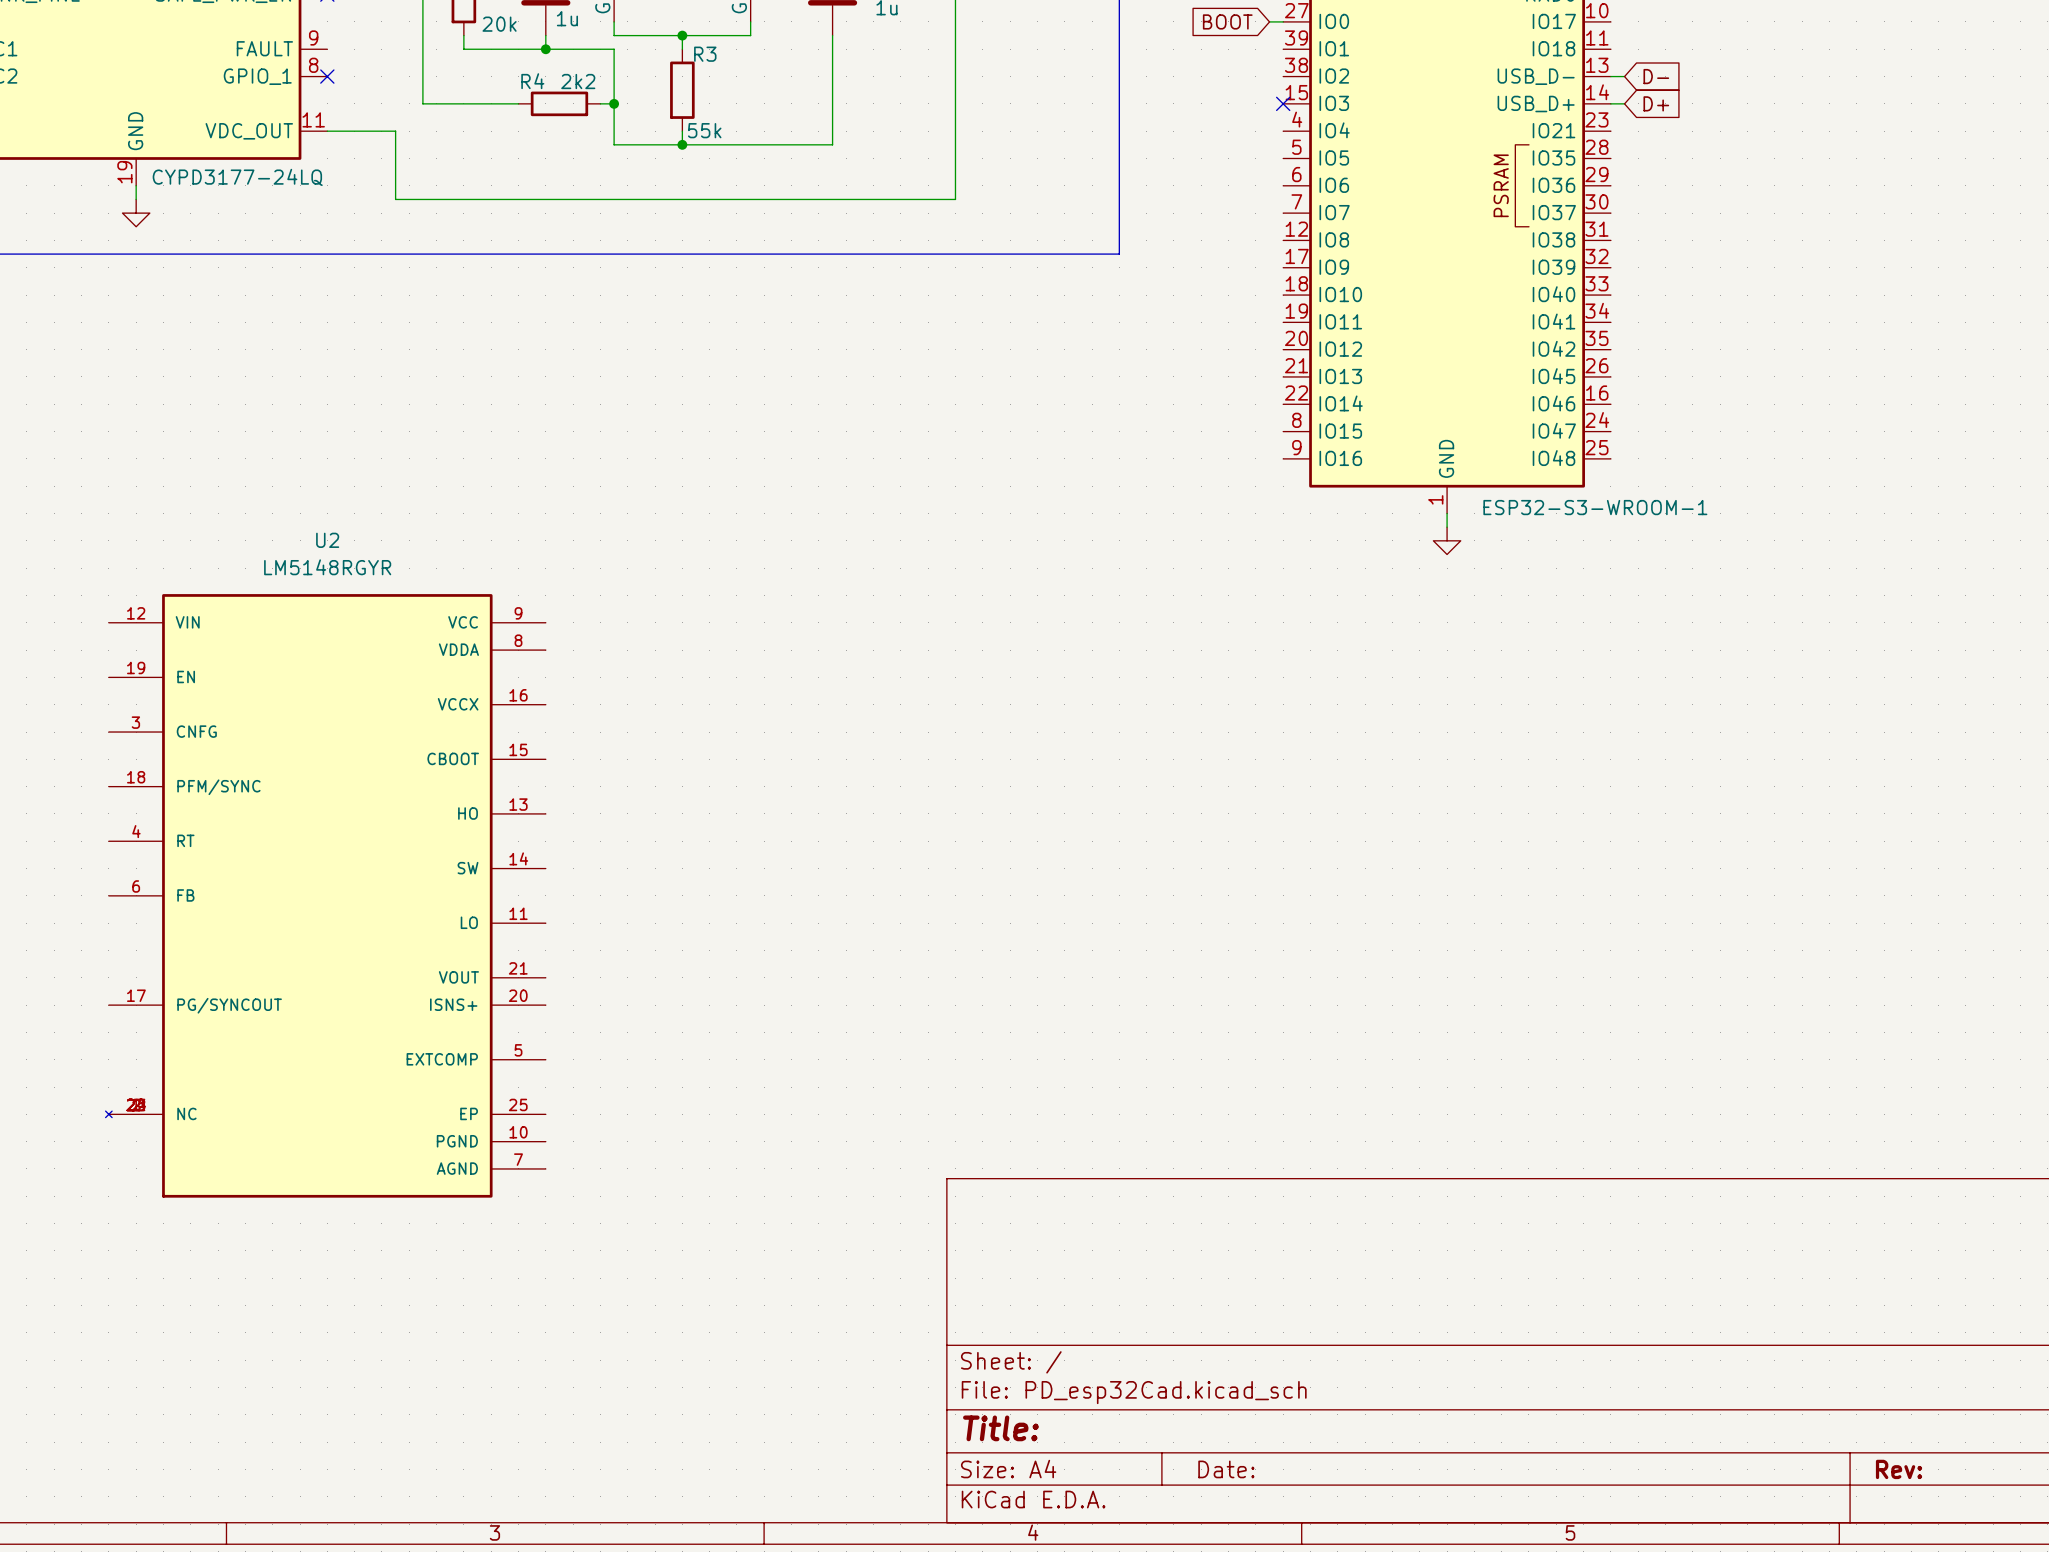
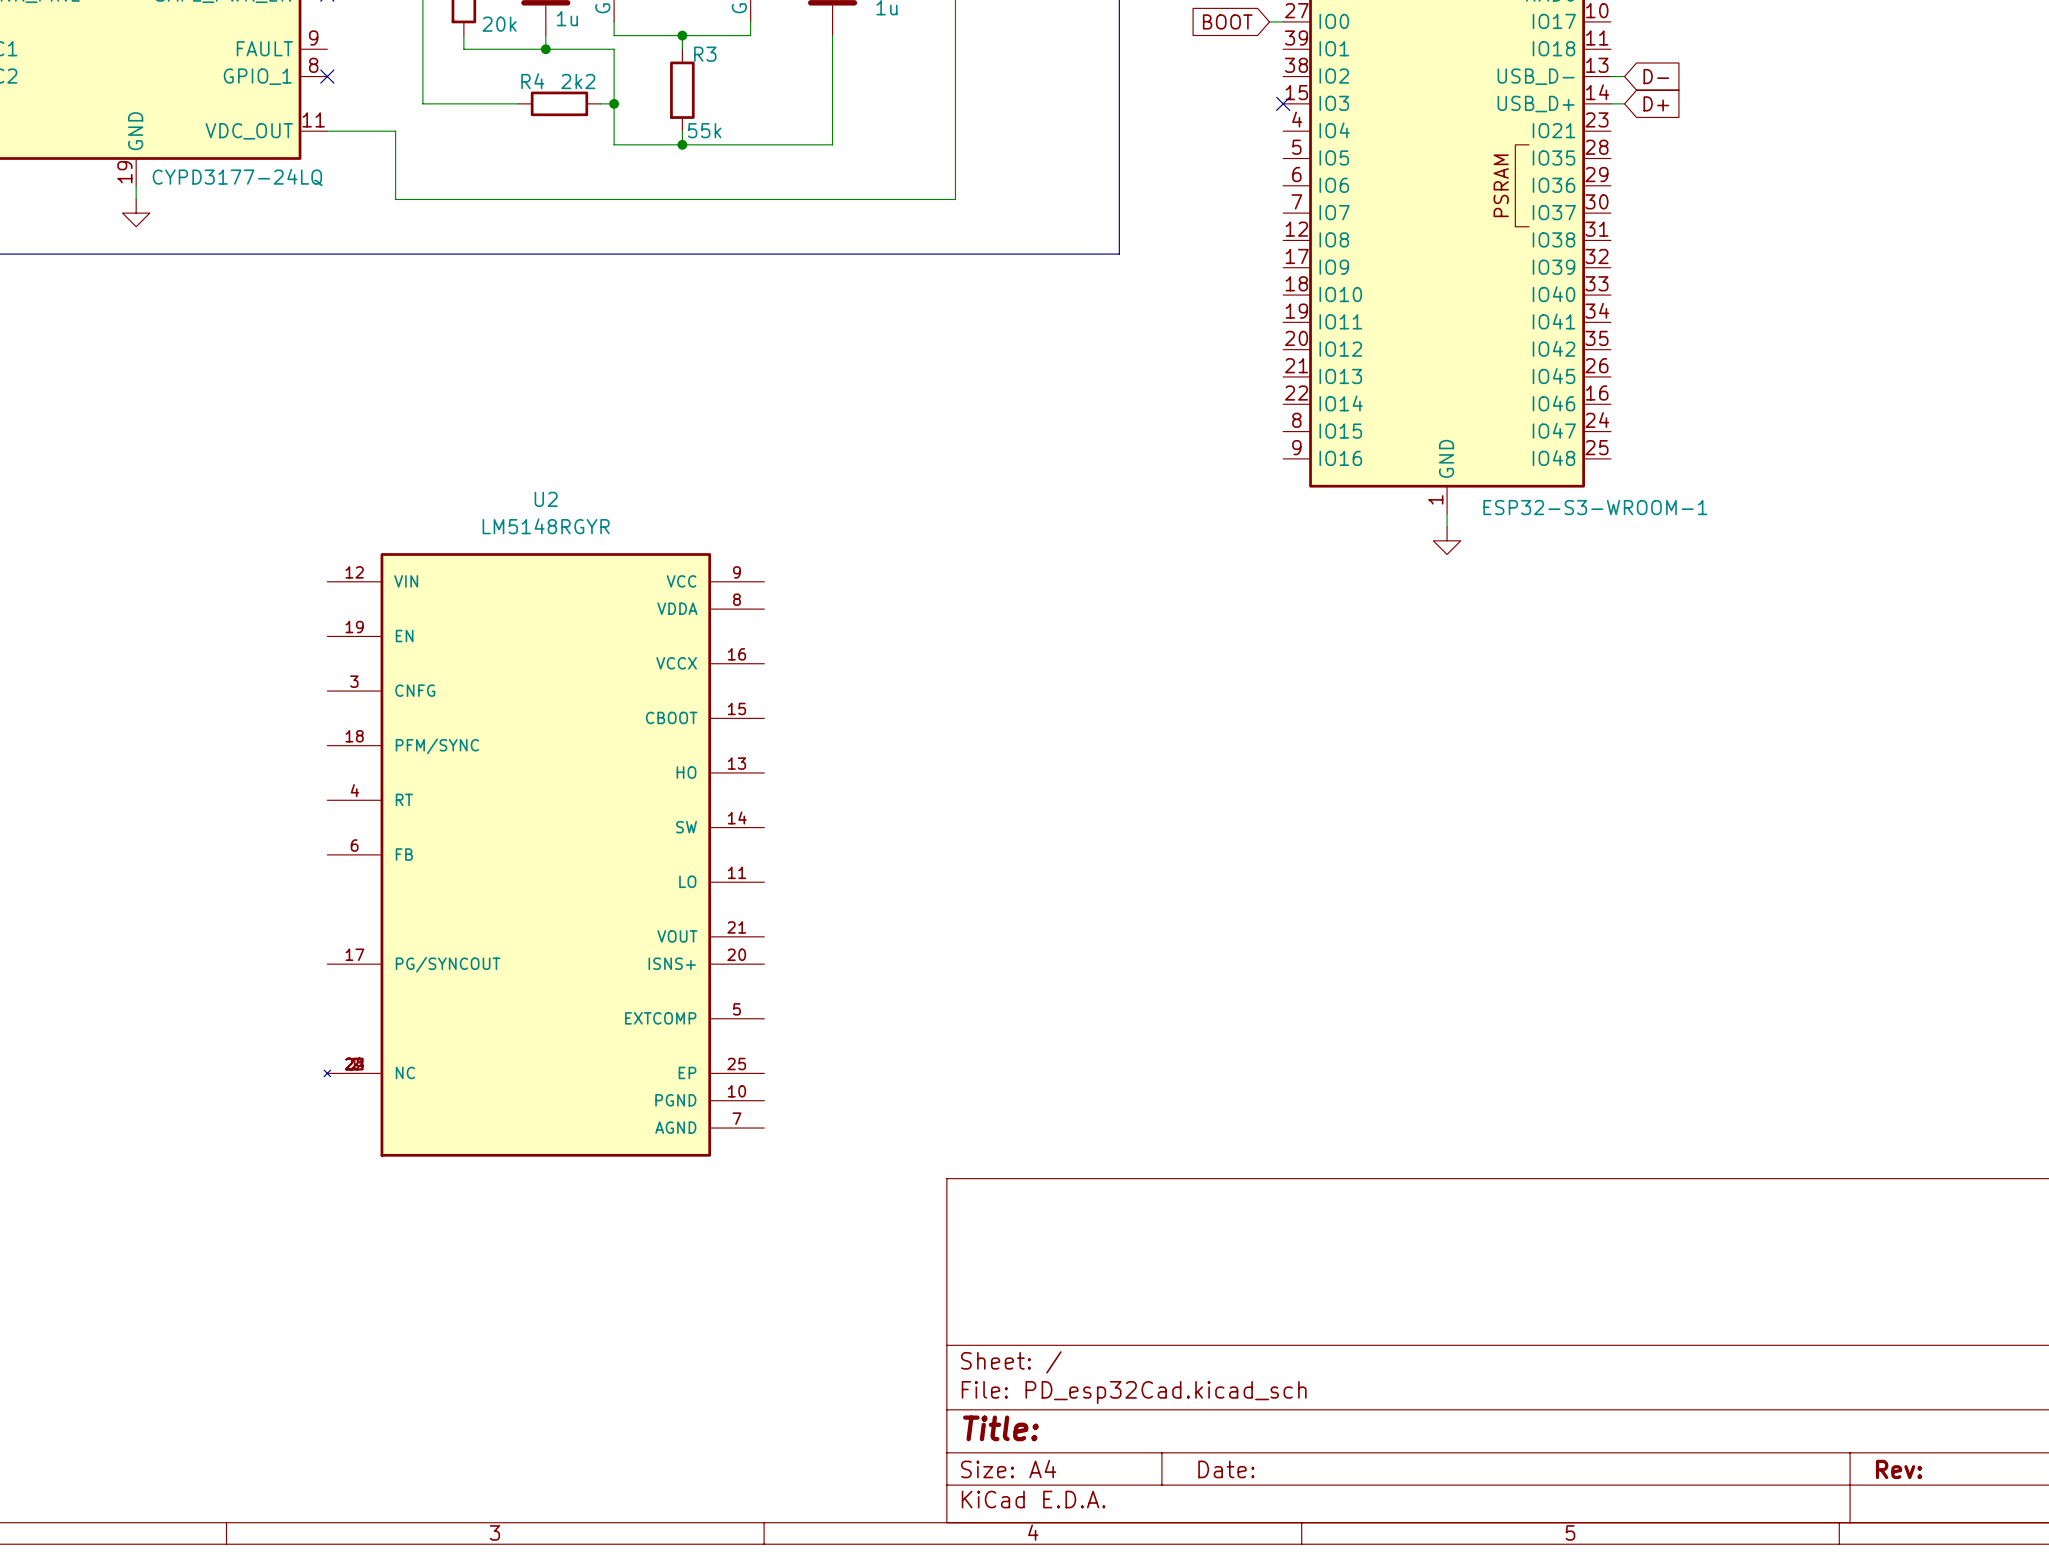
U2 position: (325, 895) -> (544, 854)

